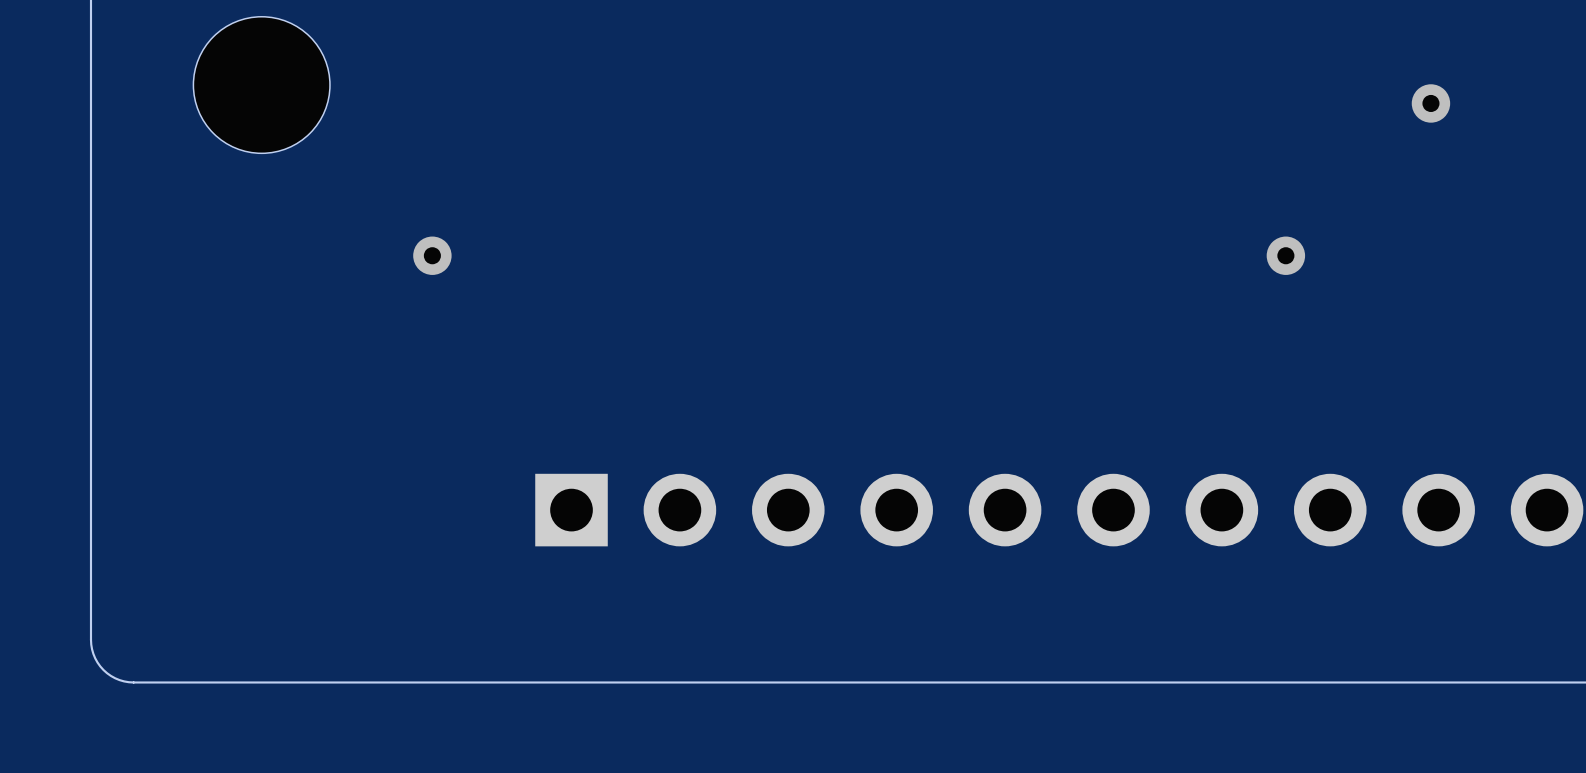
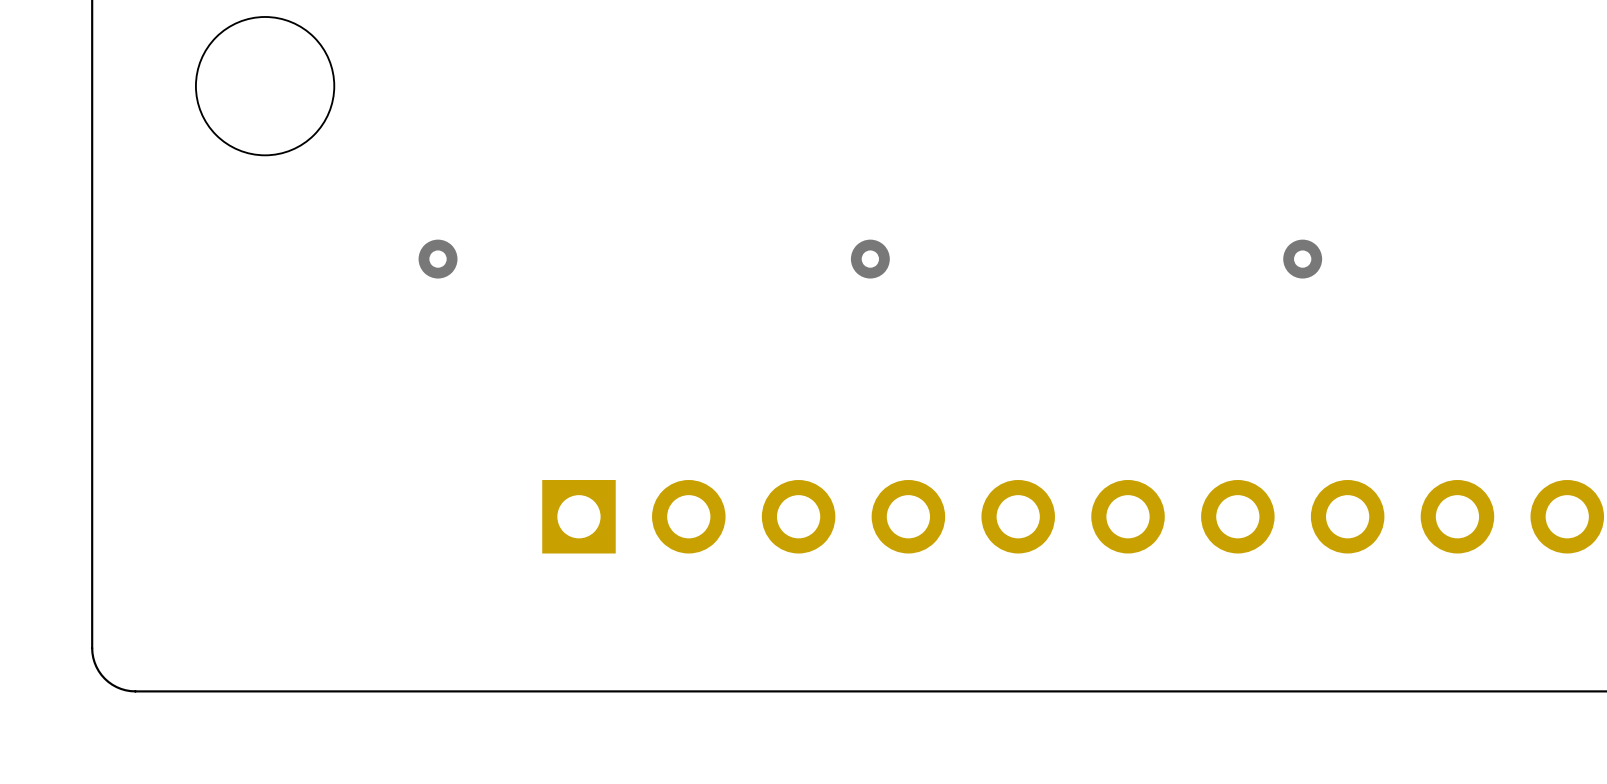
via: (1430, 103) -> none
via: none -> (870, 259)

